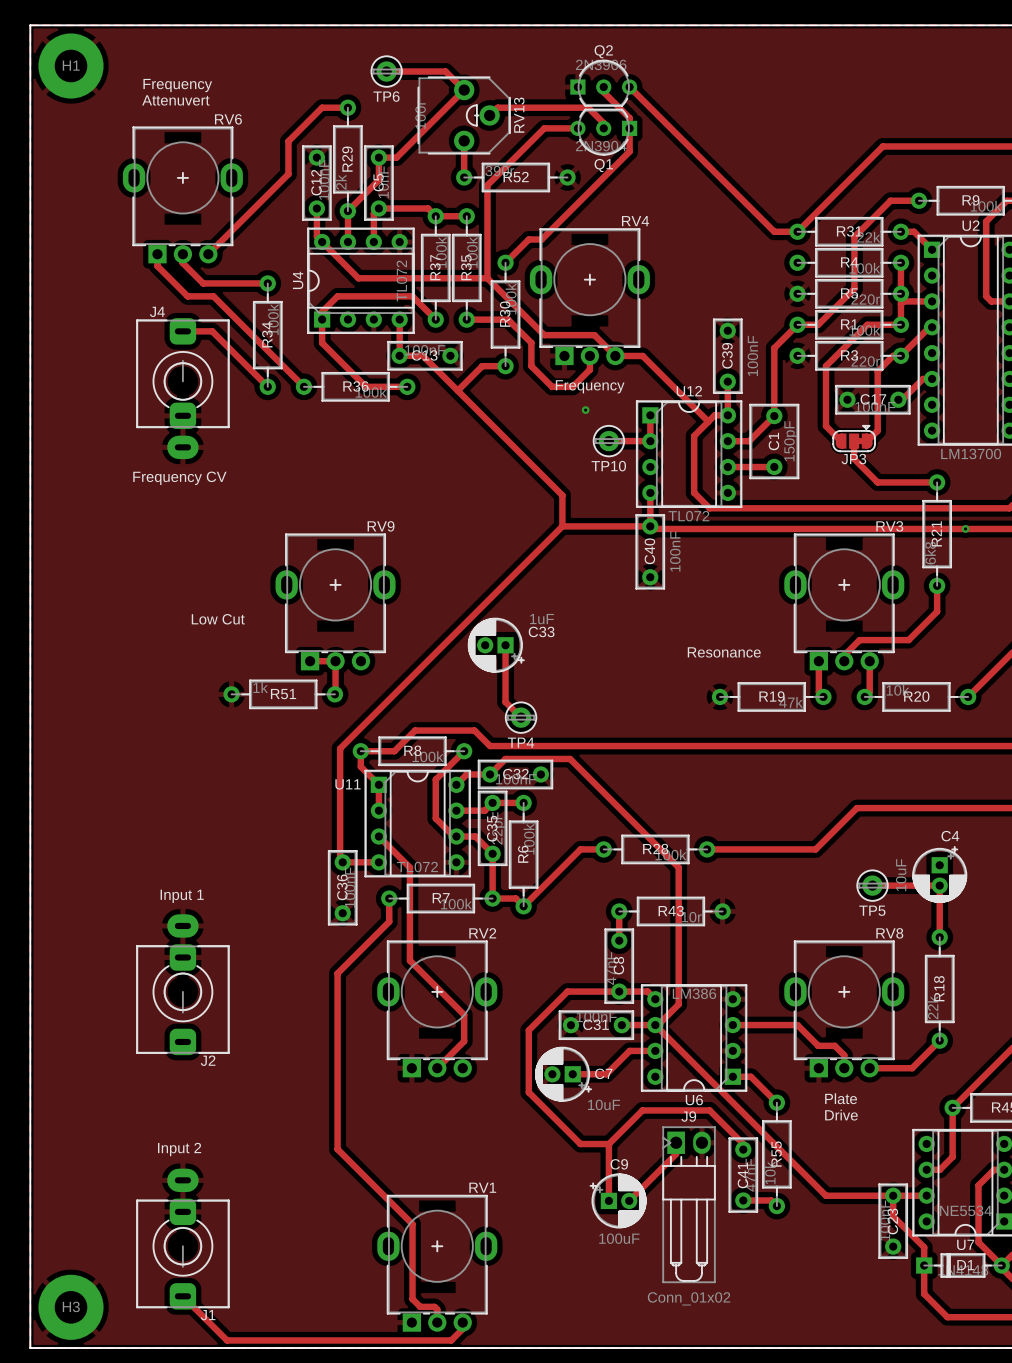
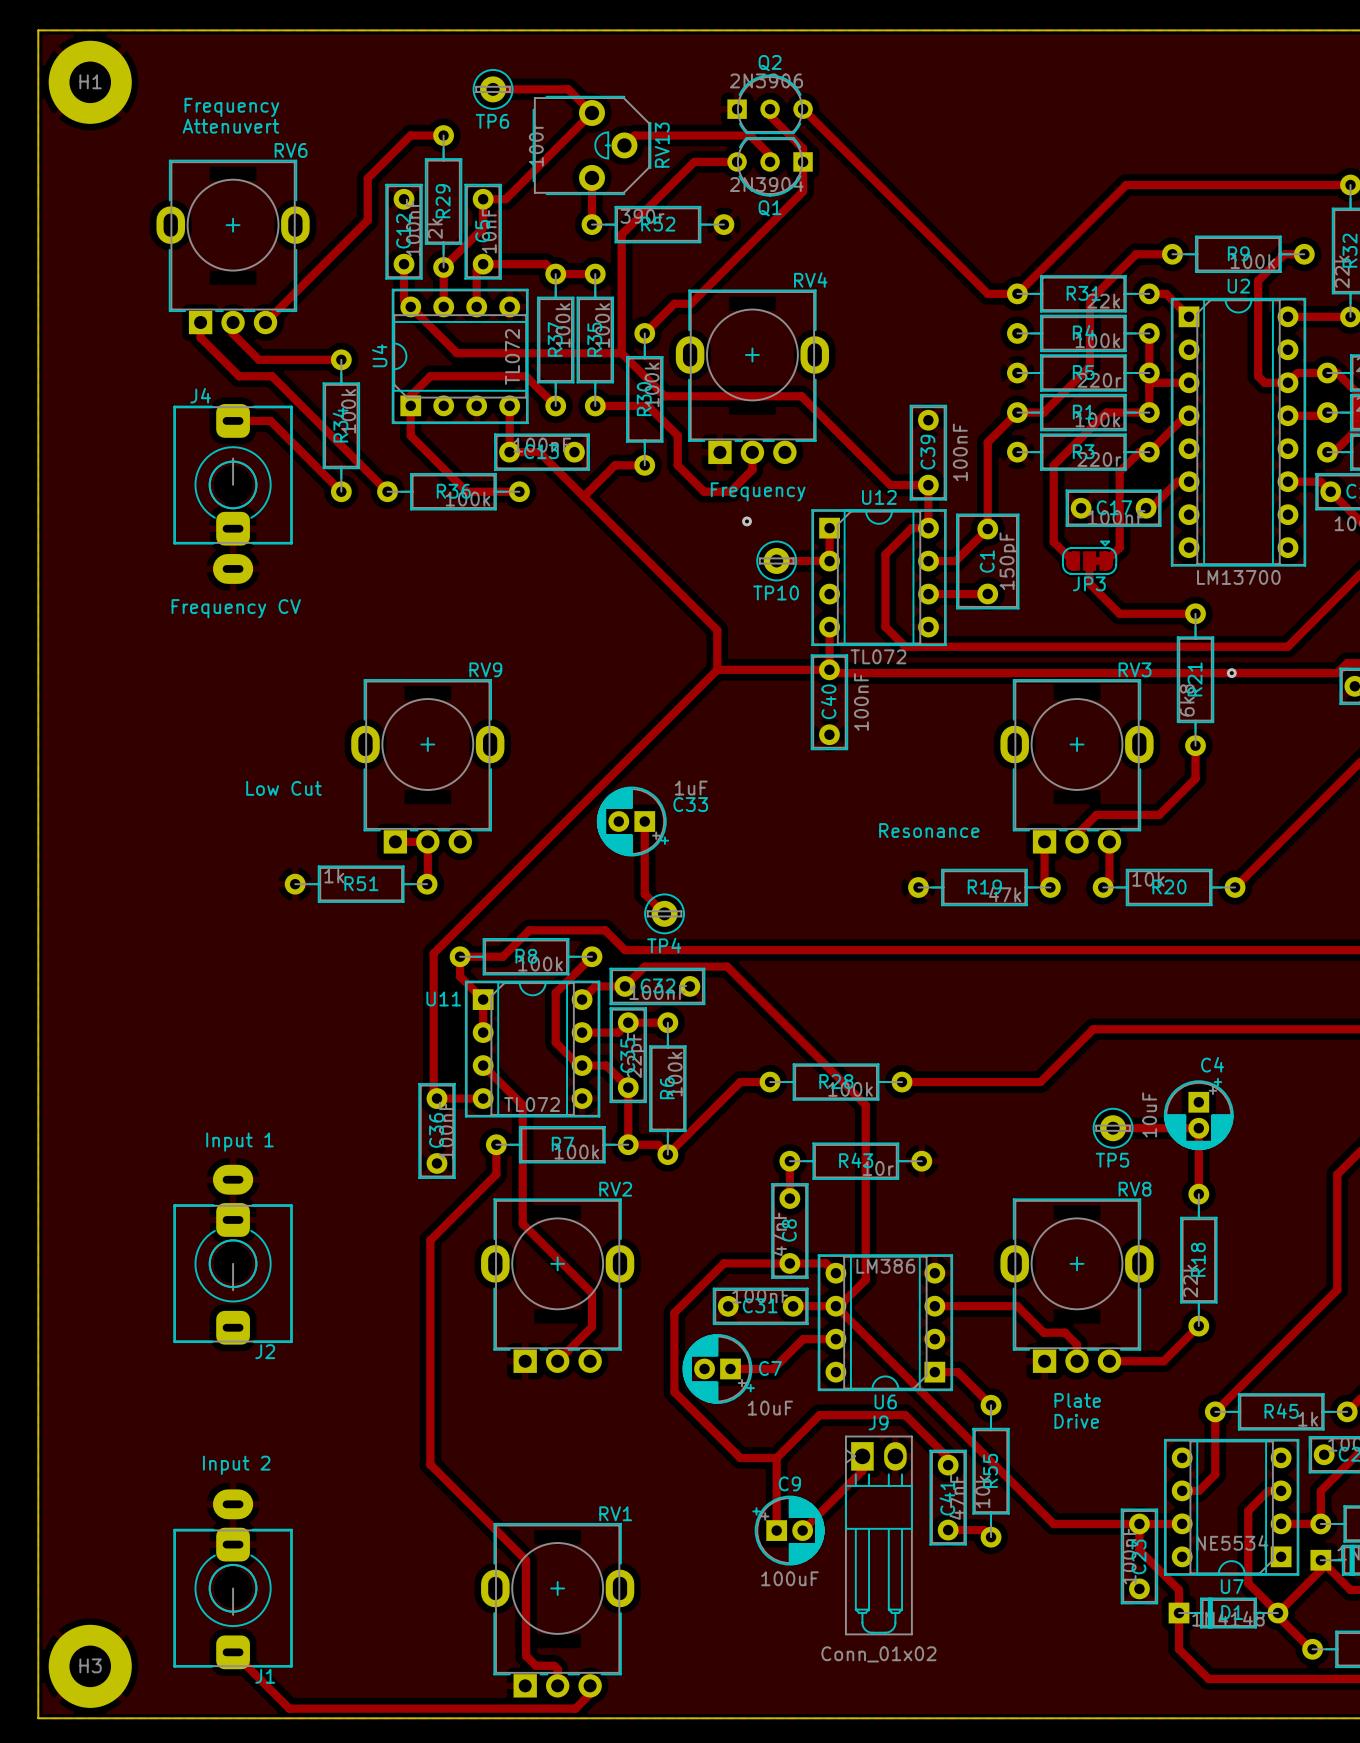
track: (521, 312) (544, 335) (594, 335) (615, 355) (642, 355) (708, 421) -> (664, 396) (801, 396) (890, 485) (928, 485)

